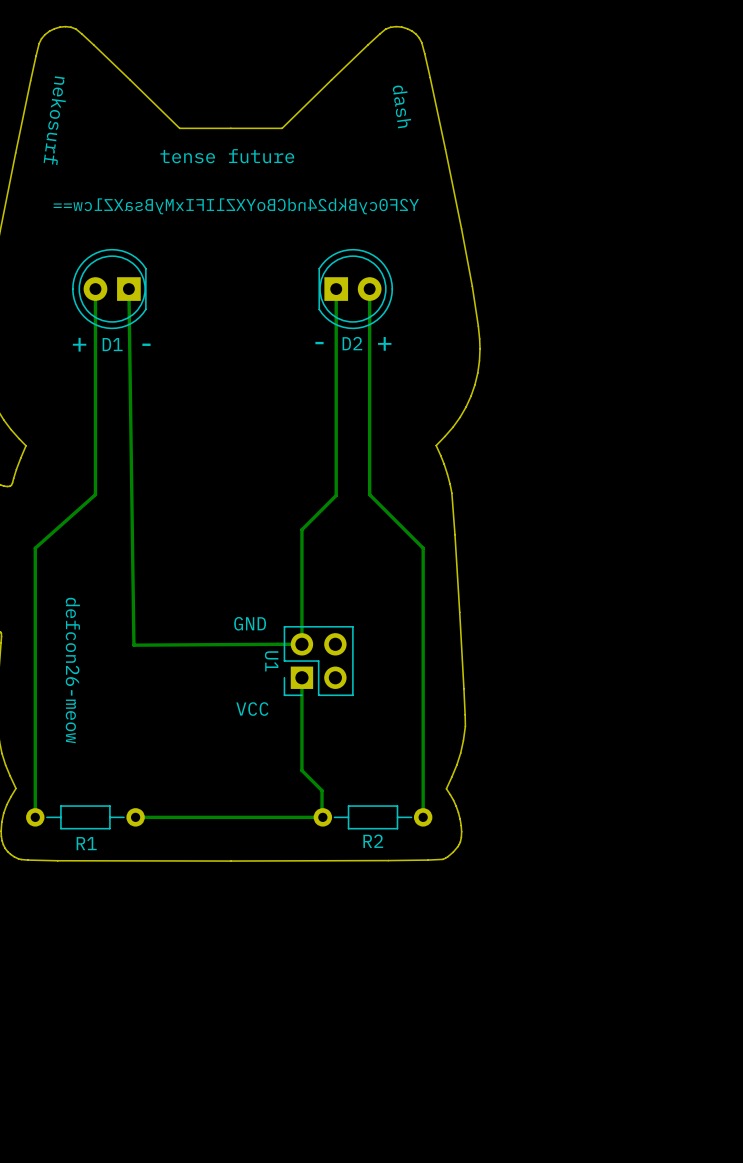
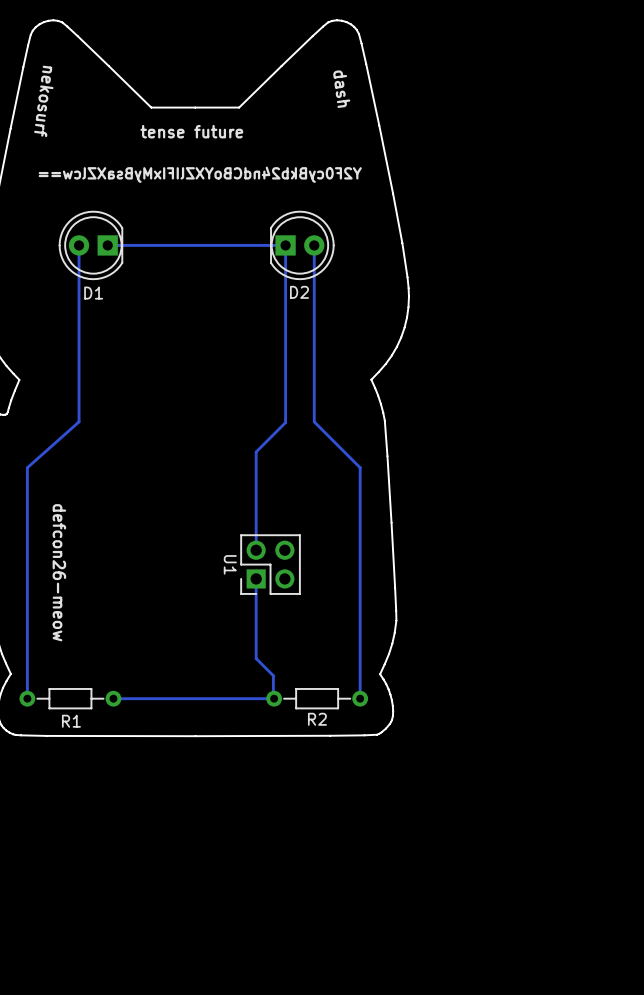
track: (128, 289) (133, 645) (301, 644) -> (107, 245) (285, 245)
text: - (319, 343) -> none
text: + (384, 343) -> none
text: + (79, 344) -> none
text: - (146, 344) -> none
text: GND (250, 623) -> none
text: VCC (252, 709) -> none

